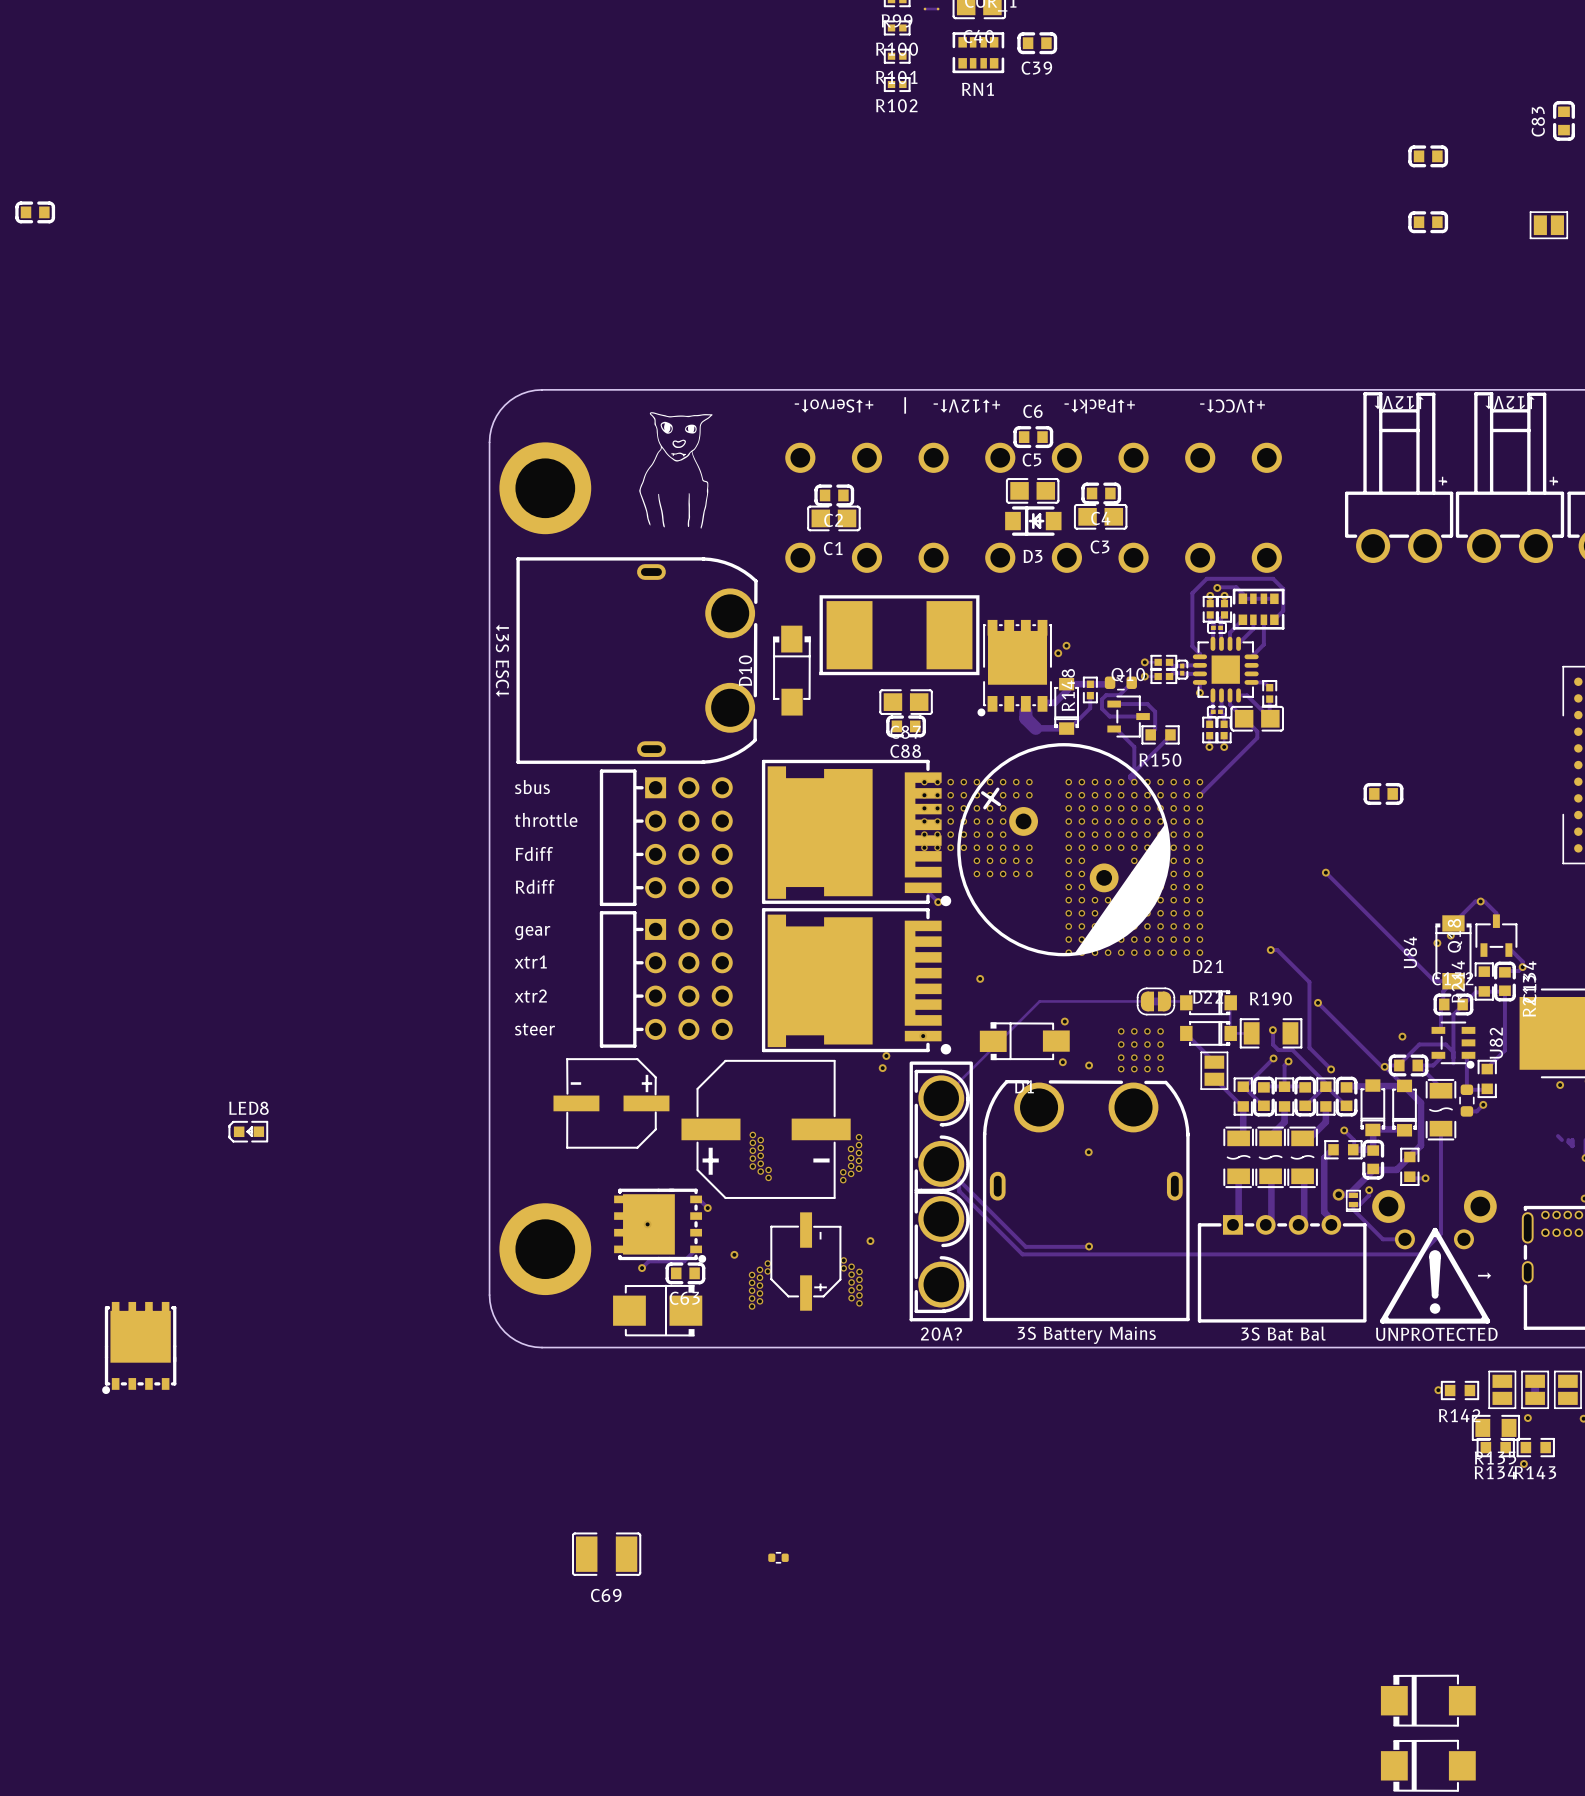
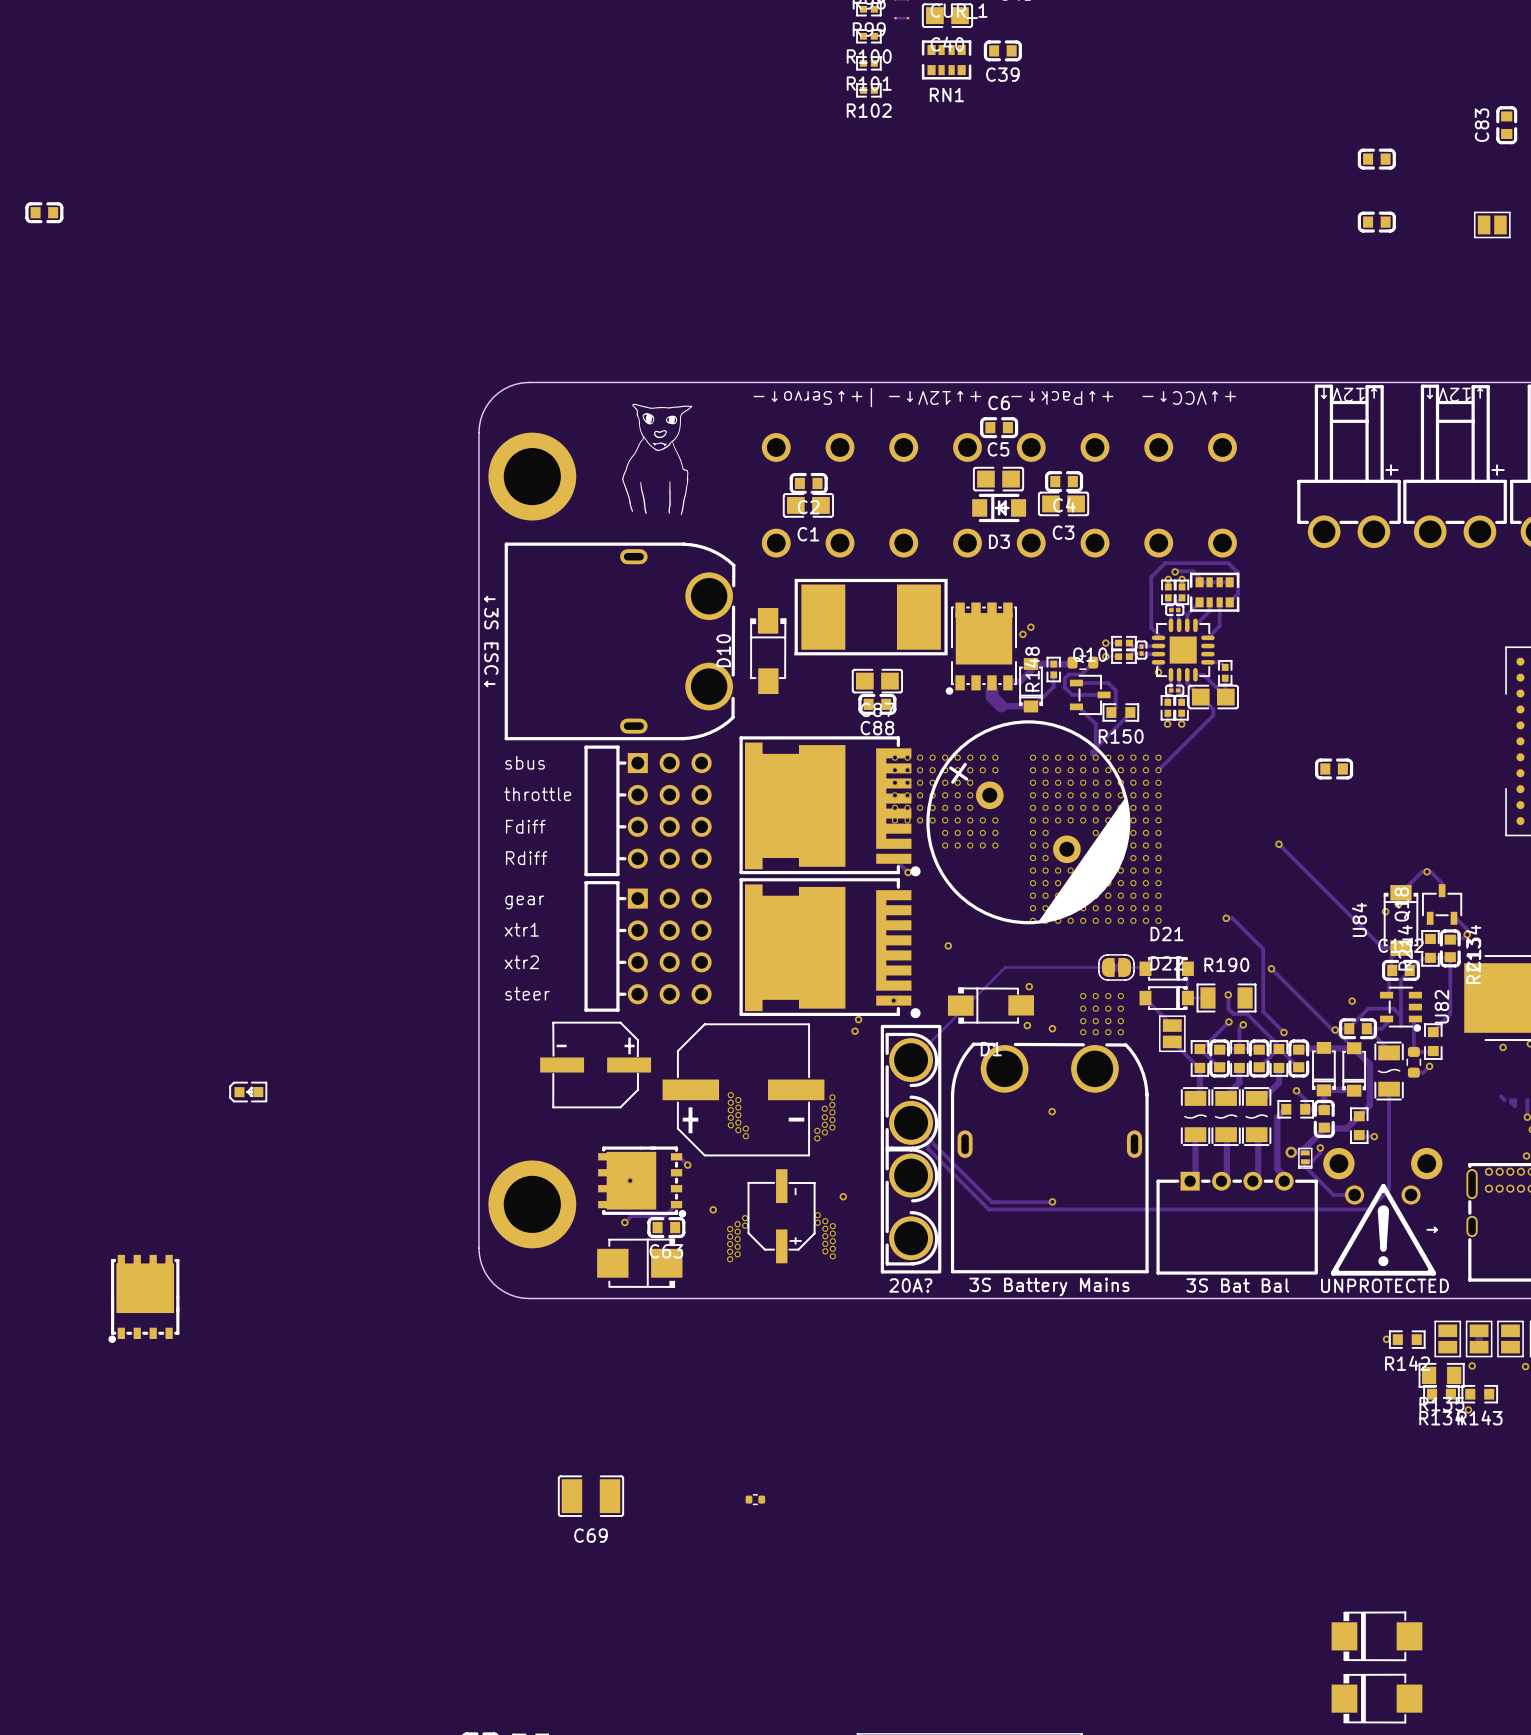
LED8 name: LED8 (248, 1108) -> none

